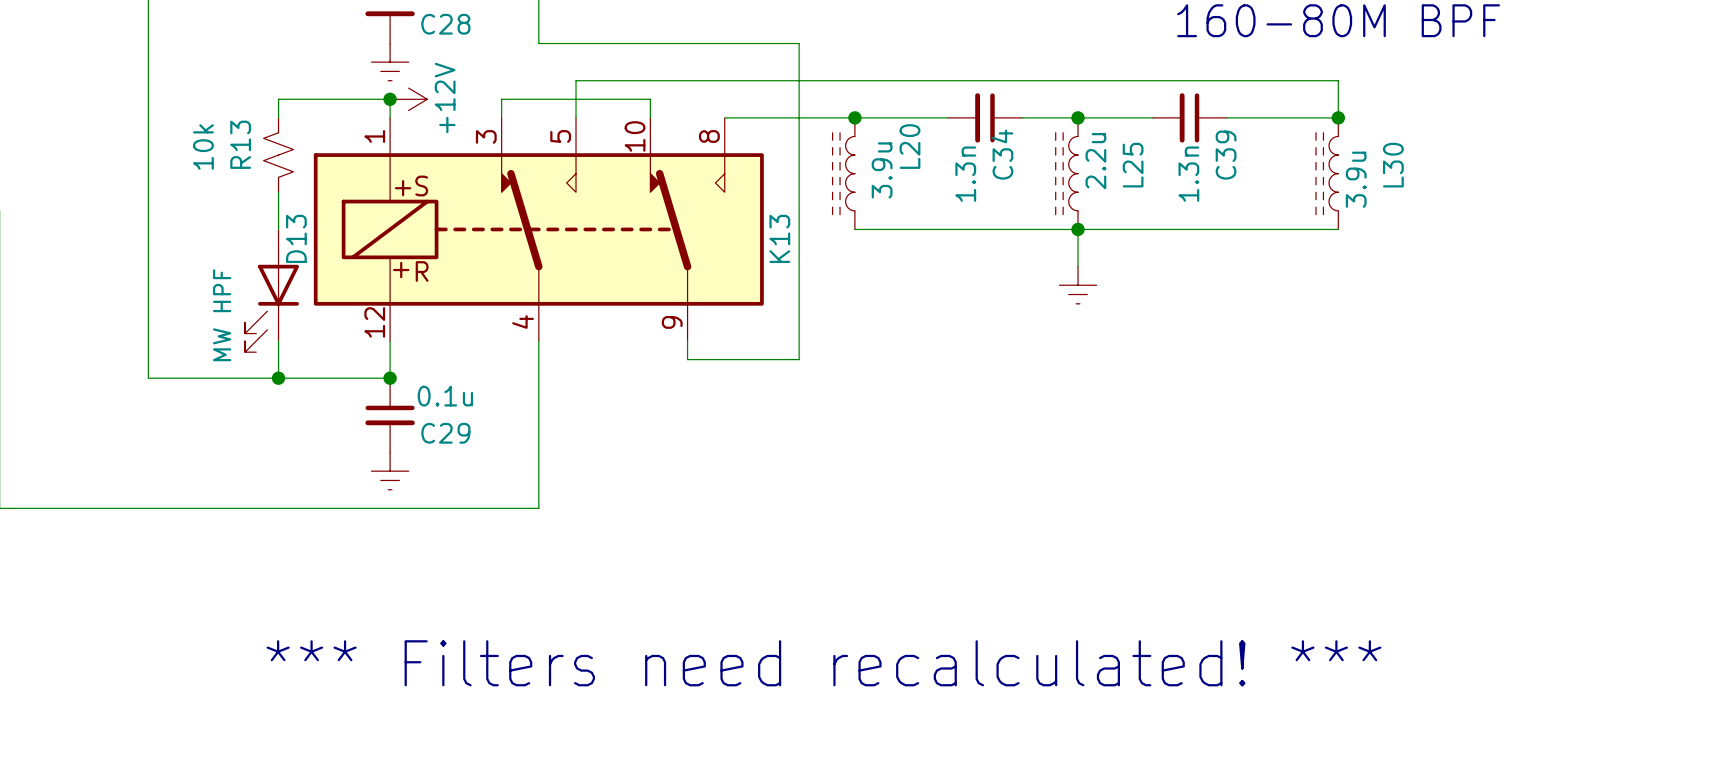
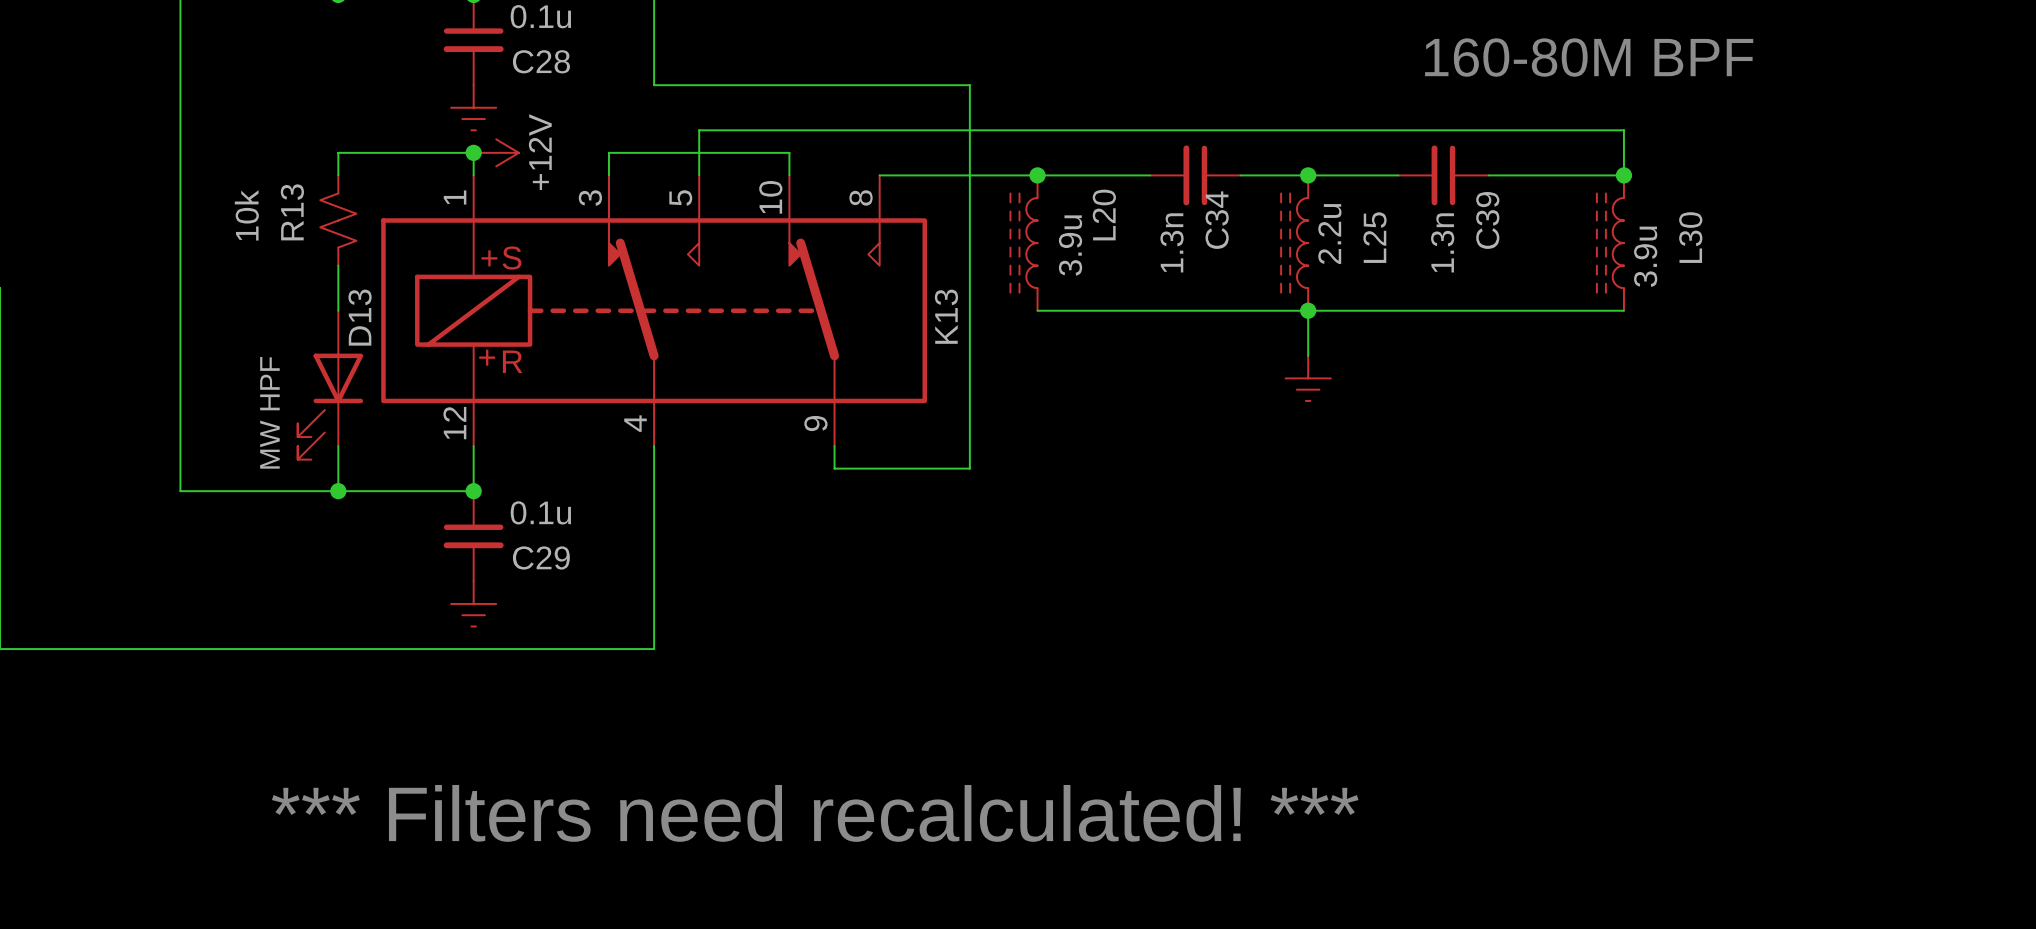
text position: *** Filters need recalculated! *** (823, 663) -> *** Filters need recalculated! *** (815, 813)

